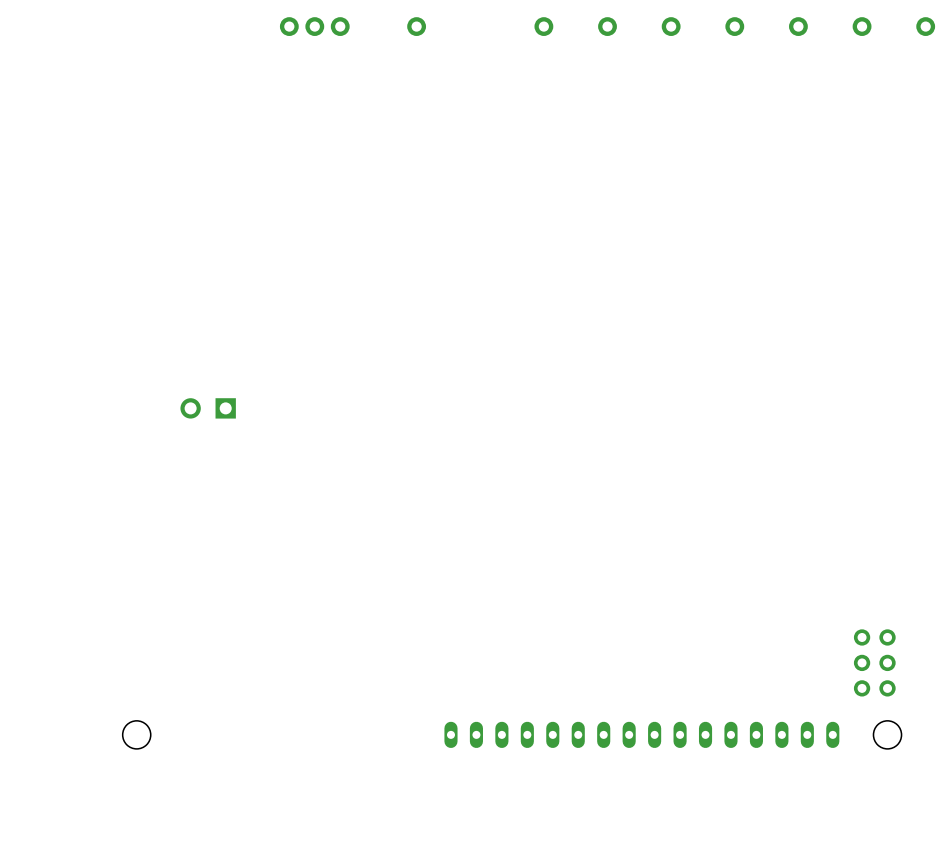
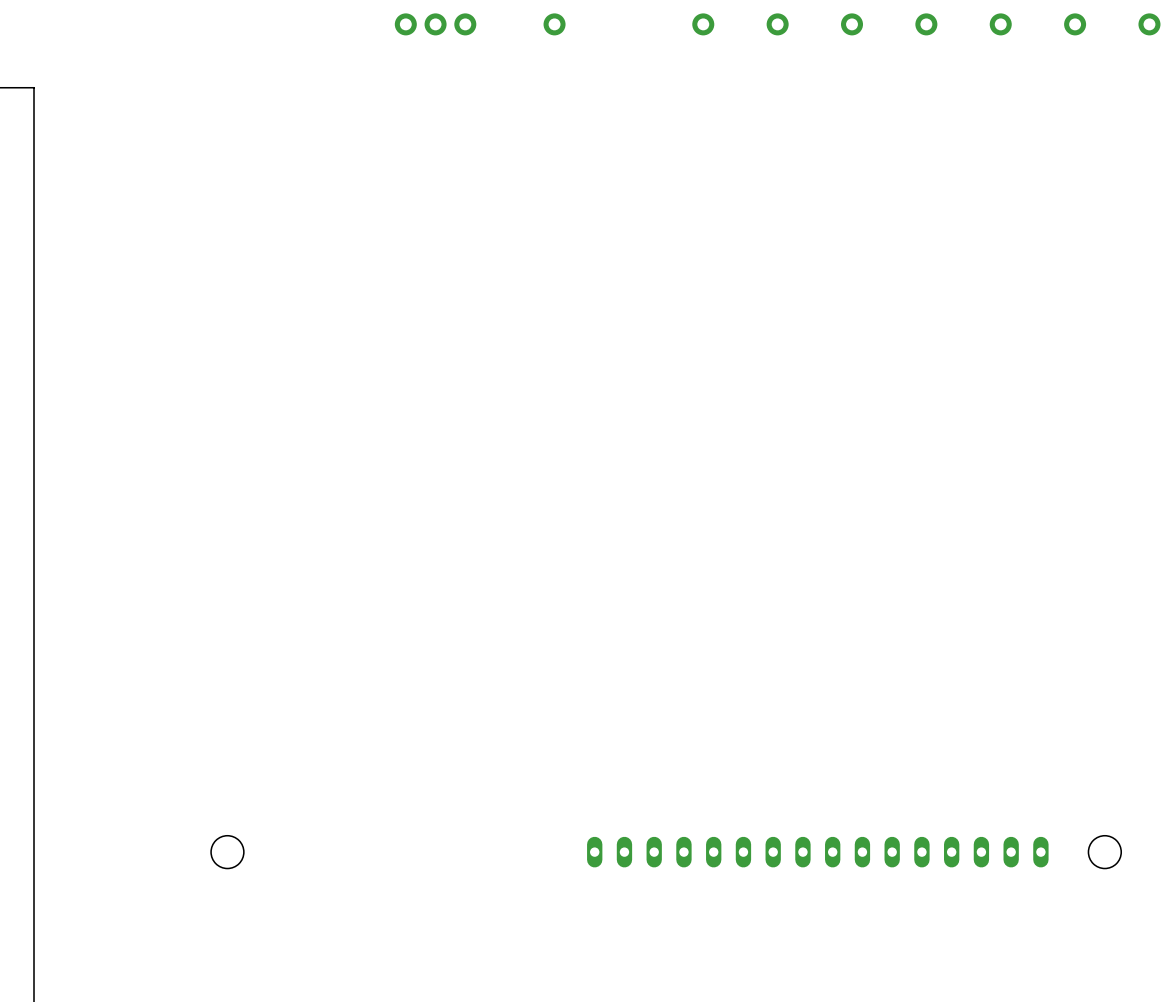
part: (208, 408) -> none
part: (874, 662) -> none

